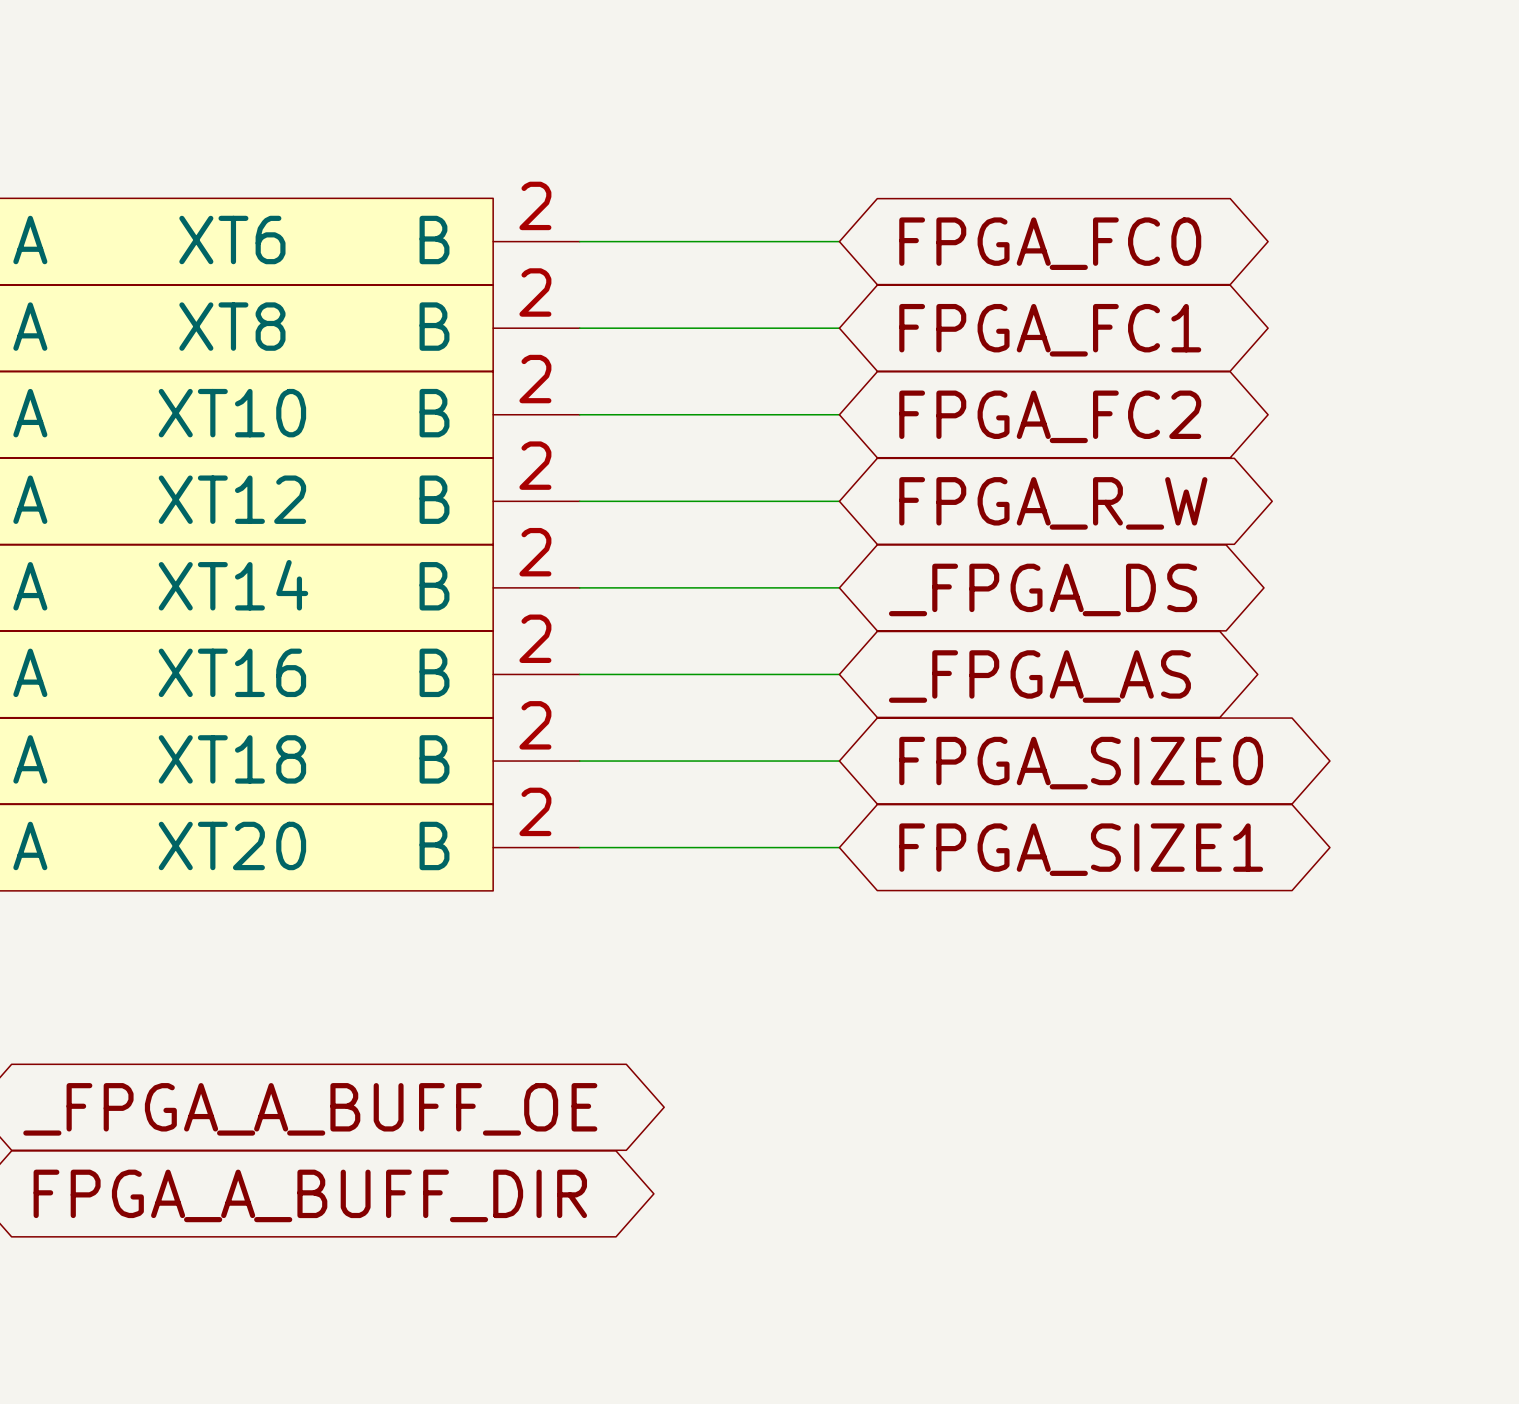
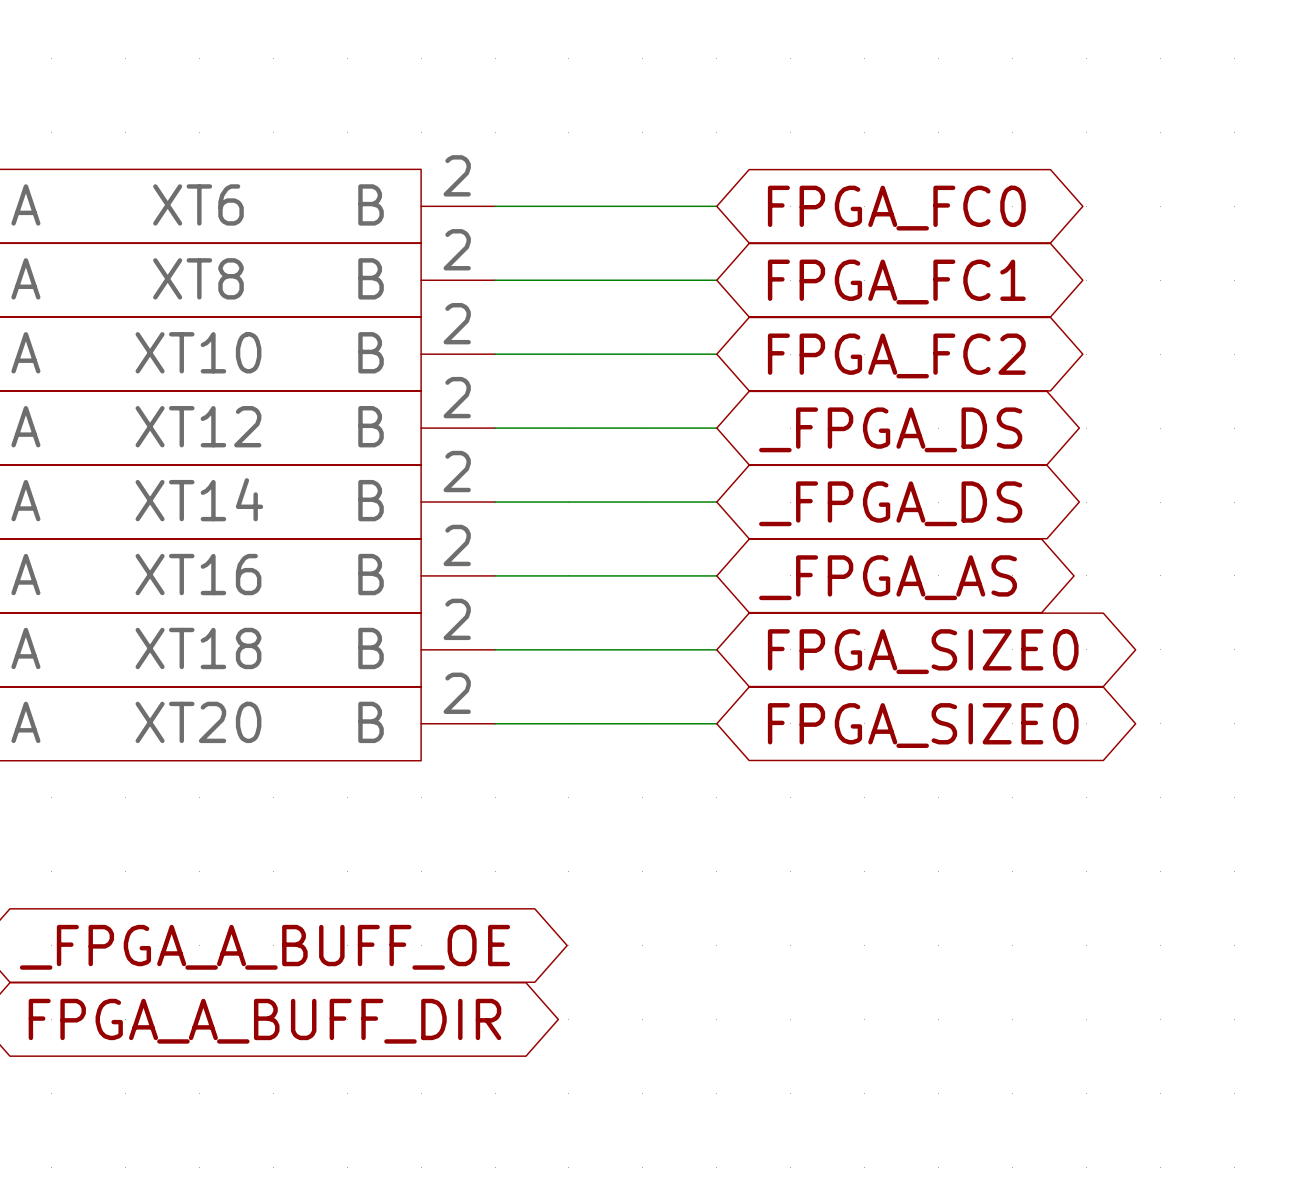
global label: FPGA_R_W (1053, 503) -> _FPGA_DS (890, 429)
global label: FPGA_SIZE1 (1081, 849) -> FPGA_SIZE0 (923, 725)

